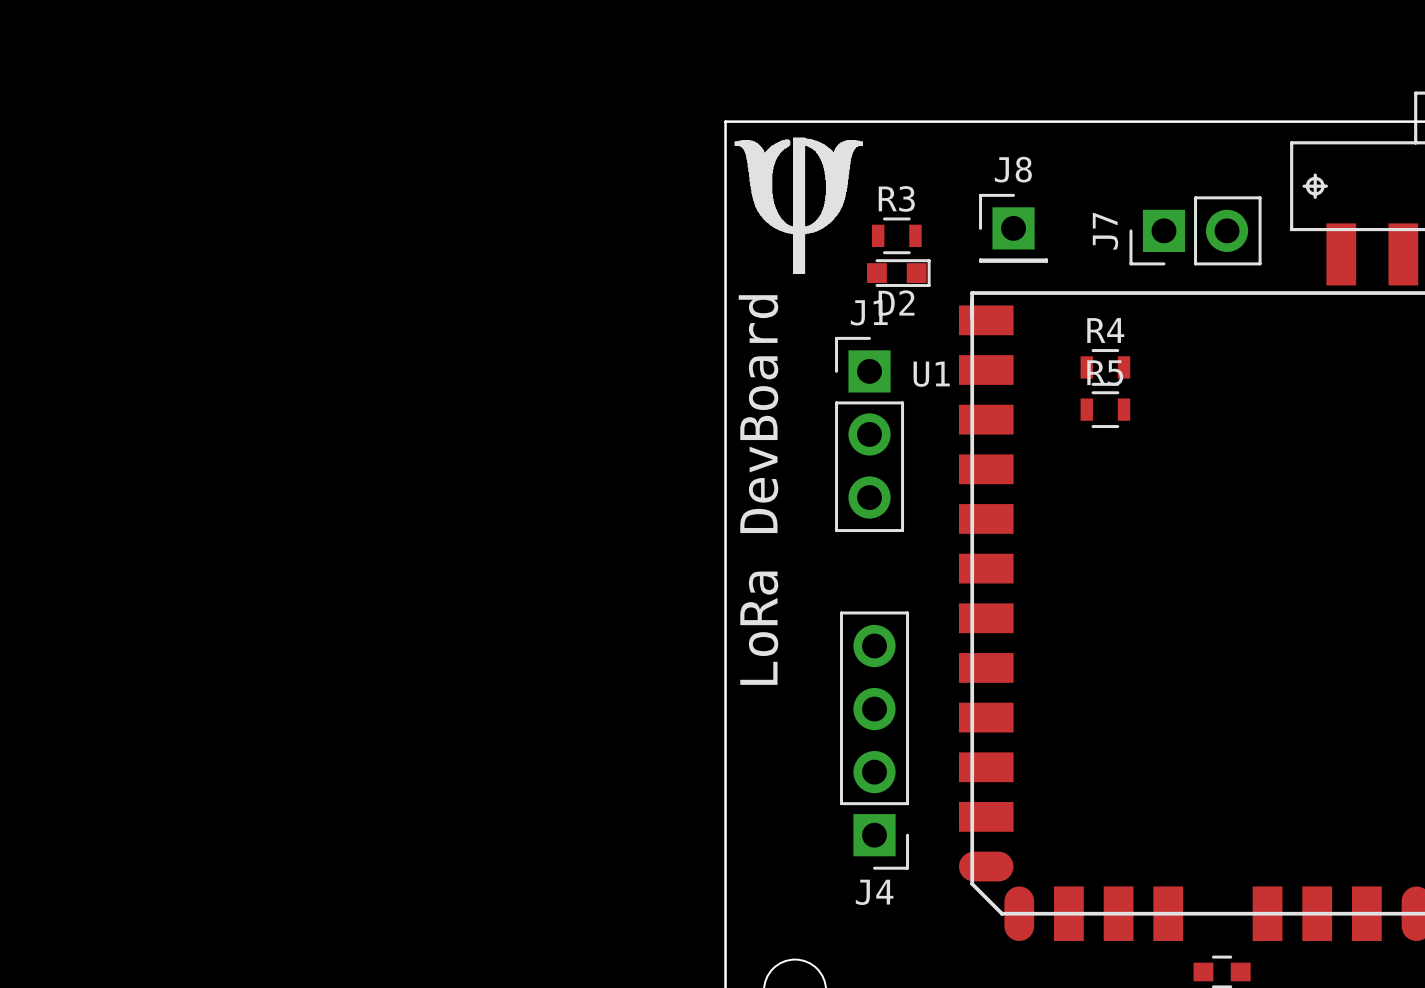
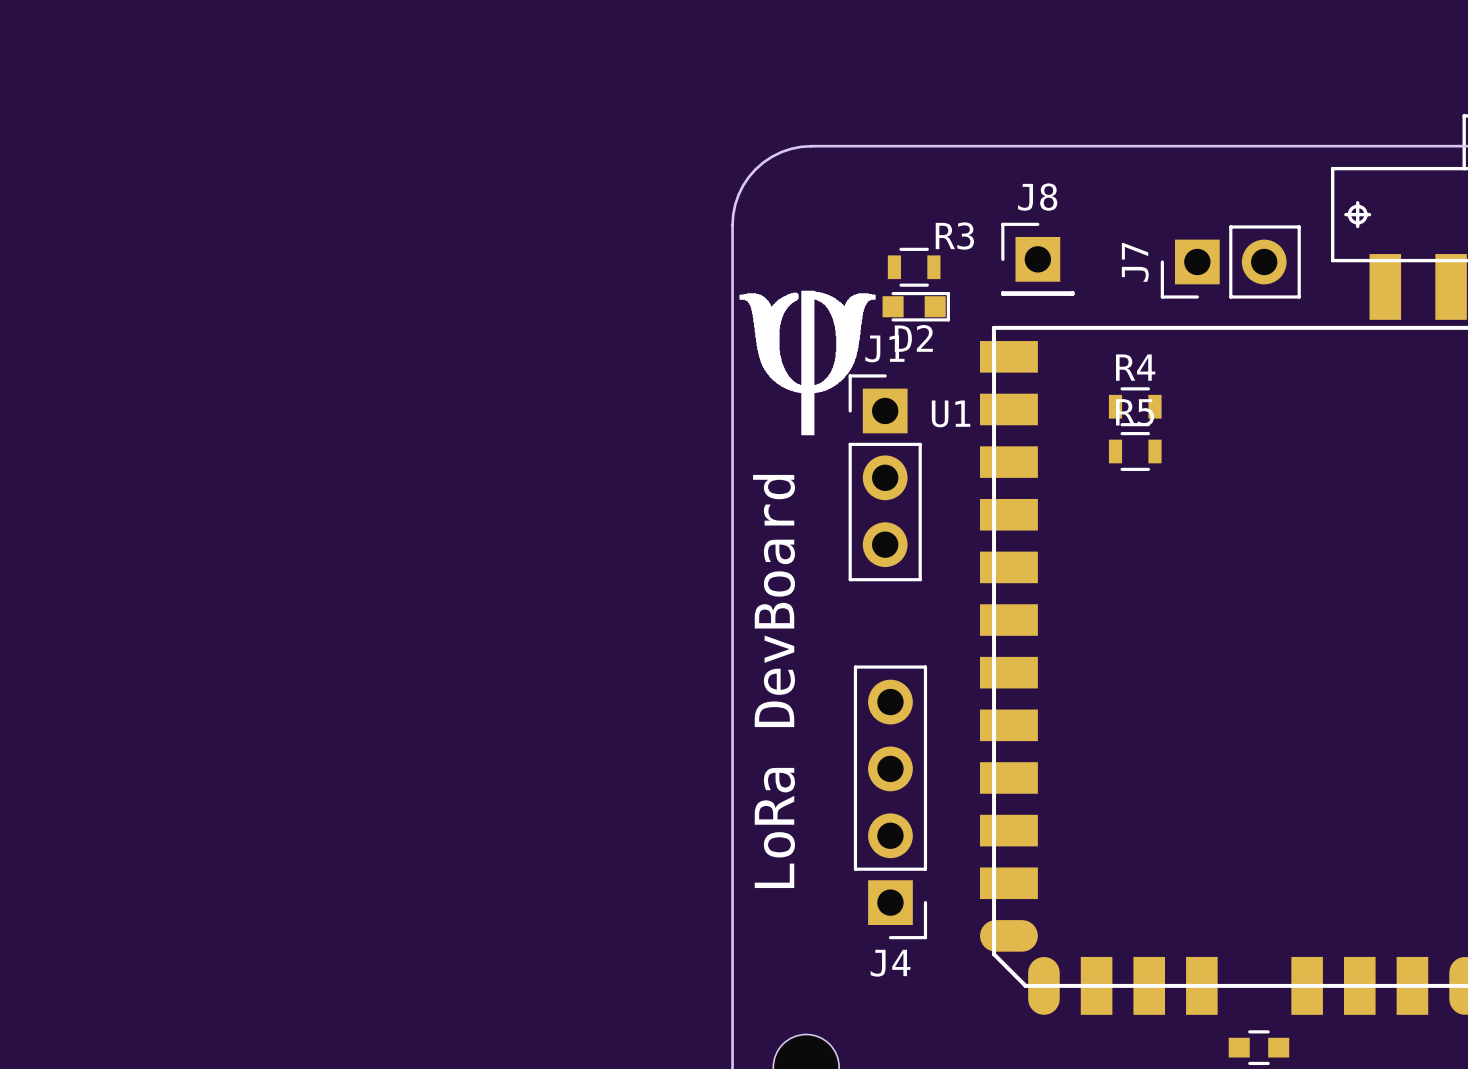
board edge: (800, 121) (725, 121) (725, 196) -> (811, 146) (781, 152) (755, 169) (738, 194) (732, 225)
R3 name position: R3 (896, 198) -> R3 (954, 236)
drawing position: (798, 205) -> (807, 362)
text position: LoRa DevBoard (758, 490) -> LoRa DevBoard (774, 681)

